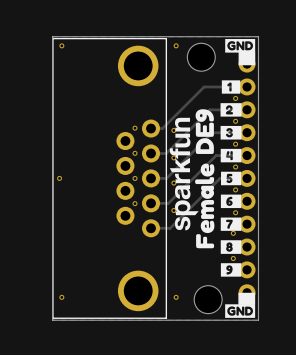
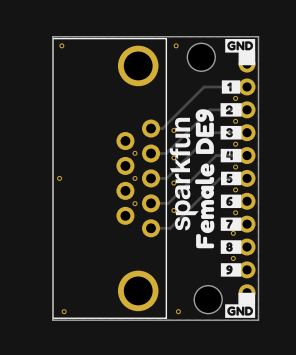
via: (135, 128) -> none
via position: (61, 297) -> (64, 311)
via position: (176, 297) -> (178, 311)

